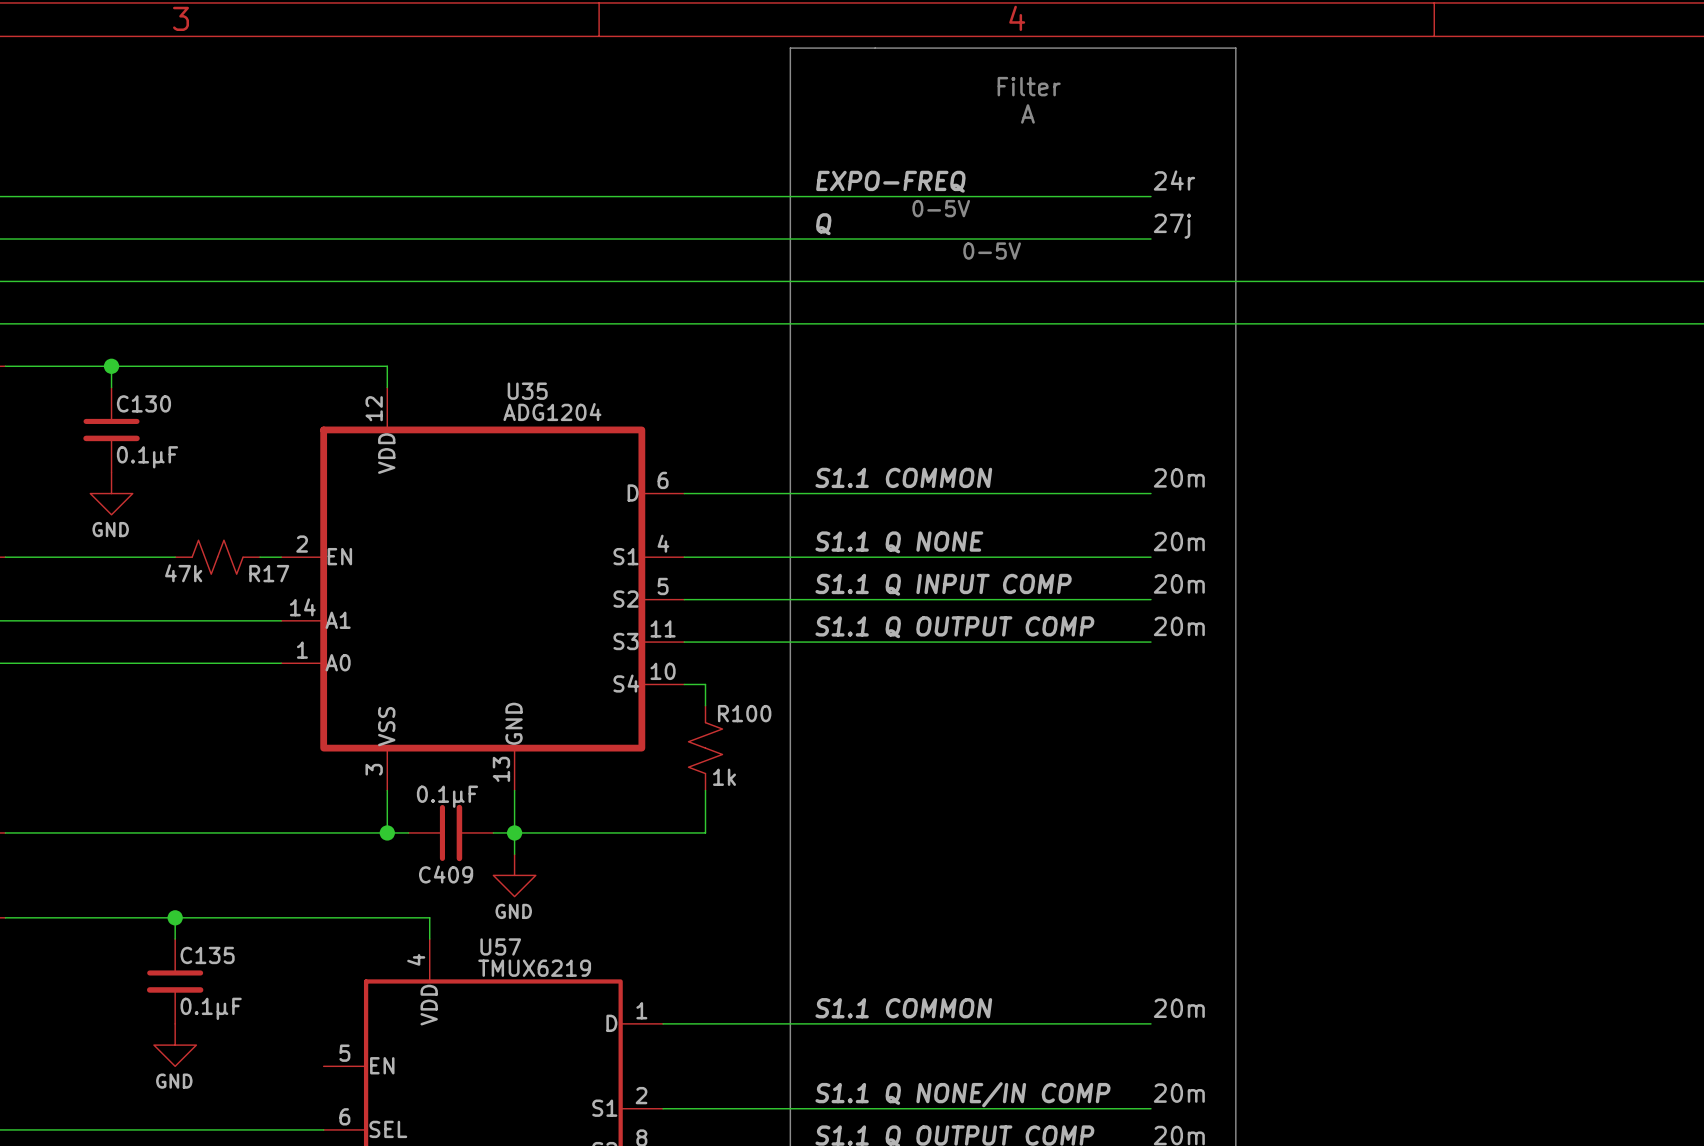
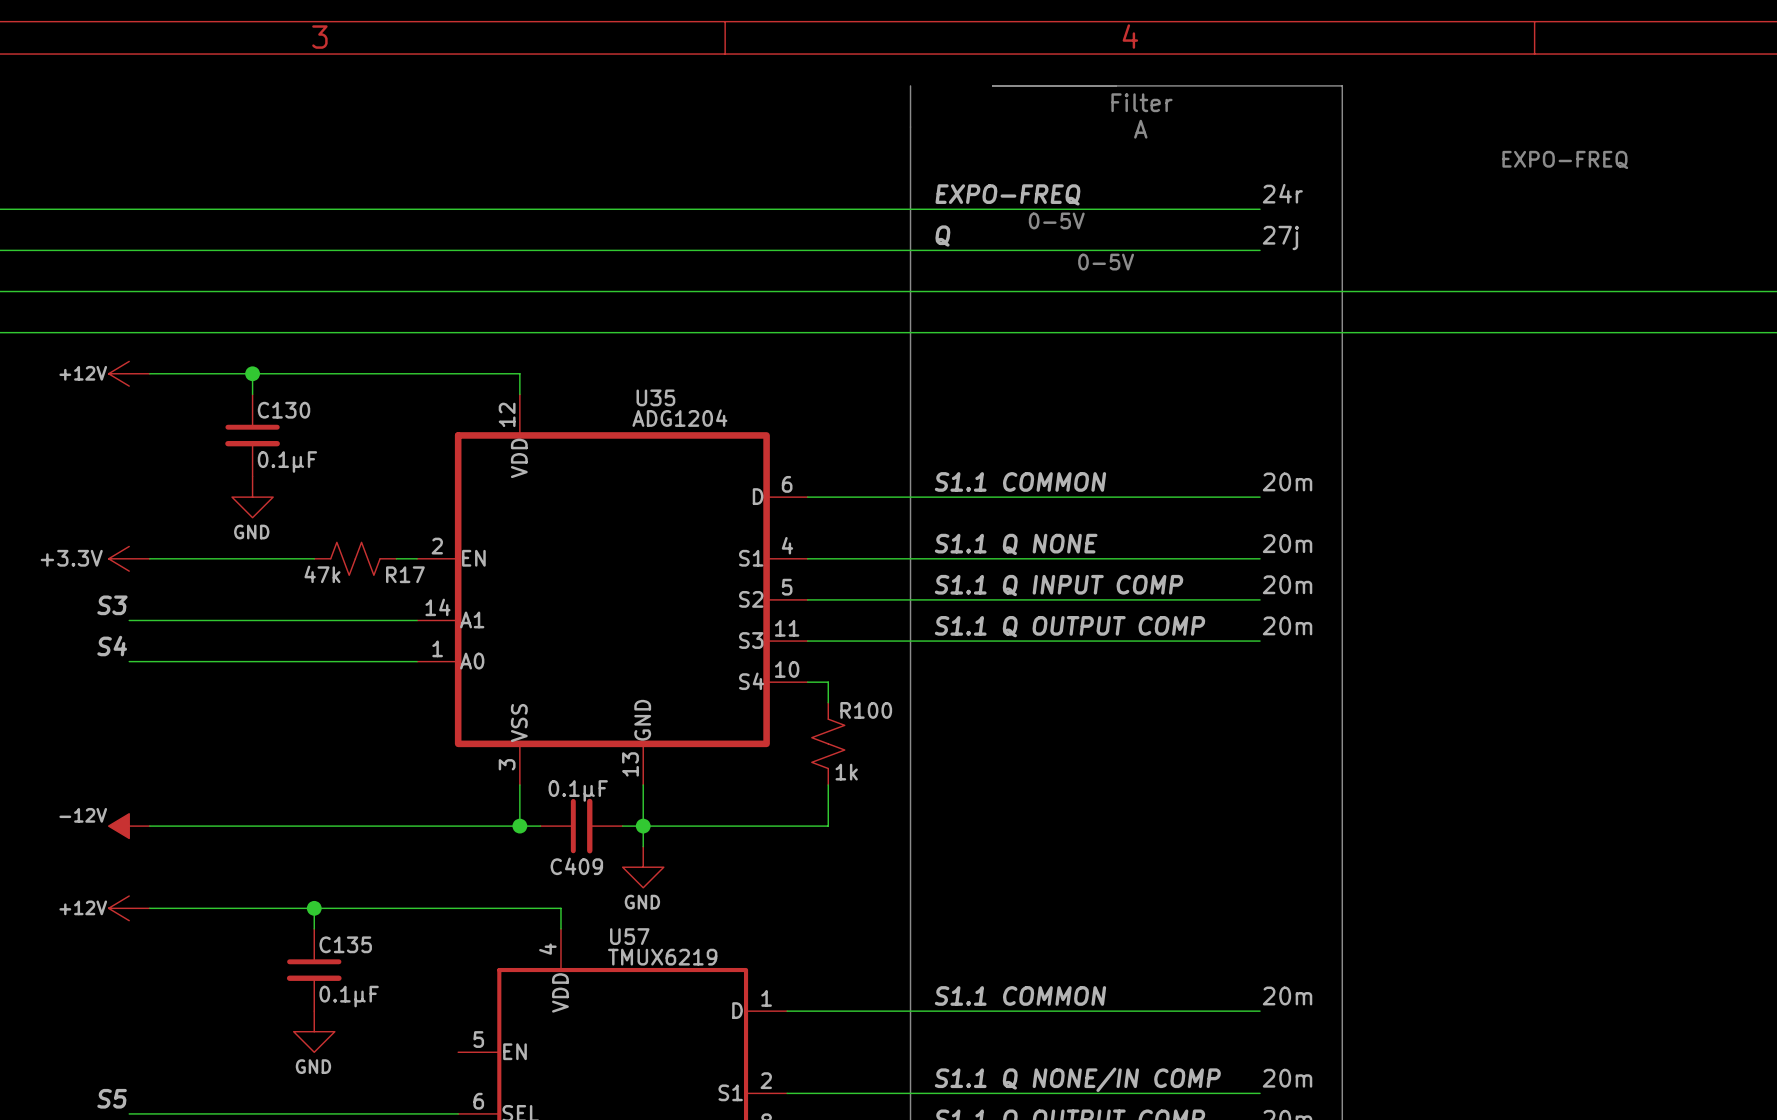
line: (790, 69) (790, 48) (1235, 48) (1235, 69) -> (992, 85) (1342, 85)
text: none -> EXPO-FREQ (1565, 159)

